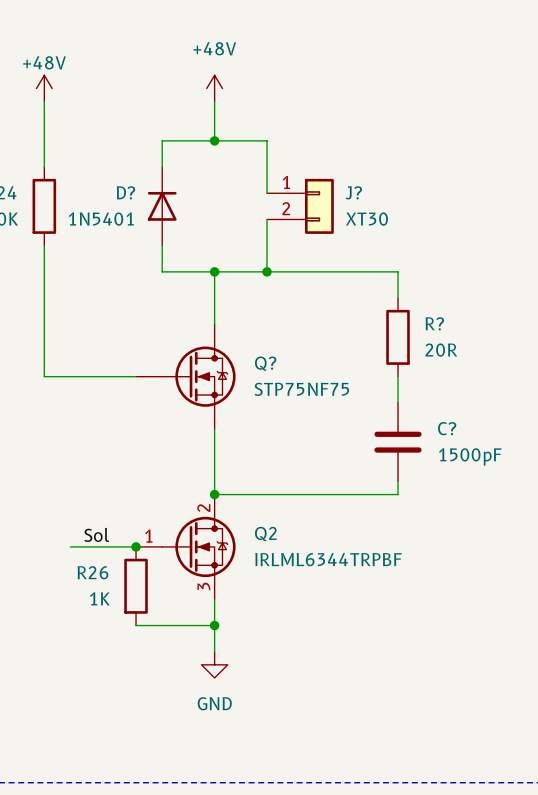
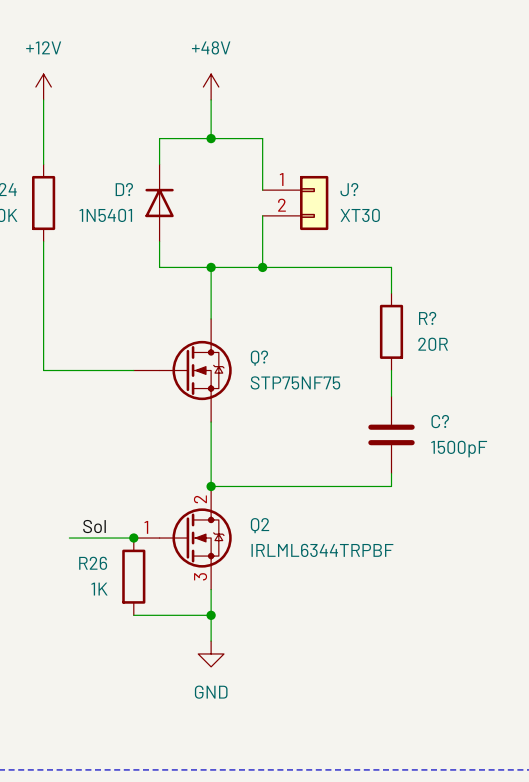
power symbol: +48V (44, 88) -> +12V (43, 87)

